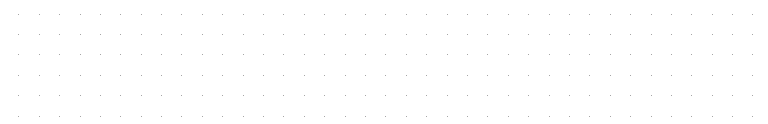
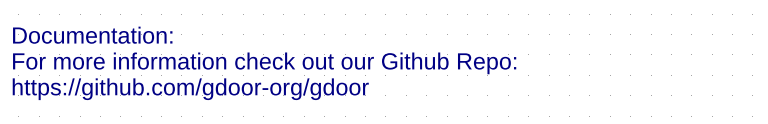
text: none -> Documentation: (92, 35)
text: none -> For more information check out our Github Repo: (264, 63)
text: none -> https://github.com/gdoor-org/gdoor (190, 89)

